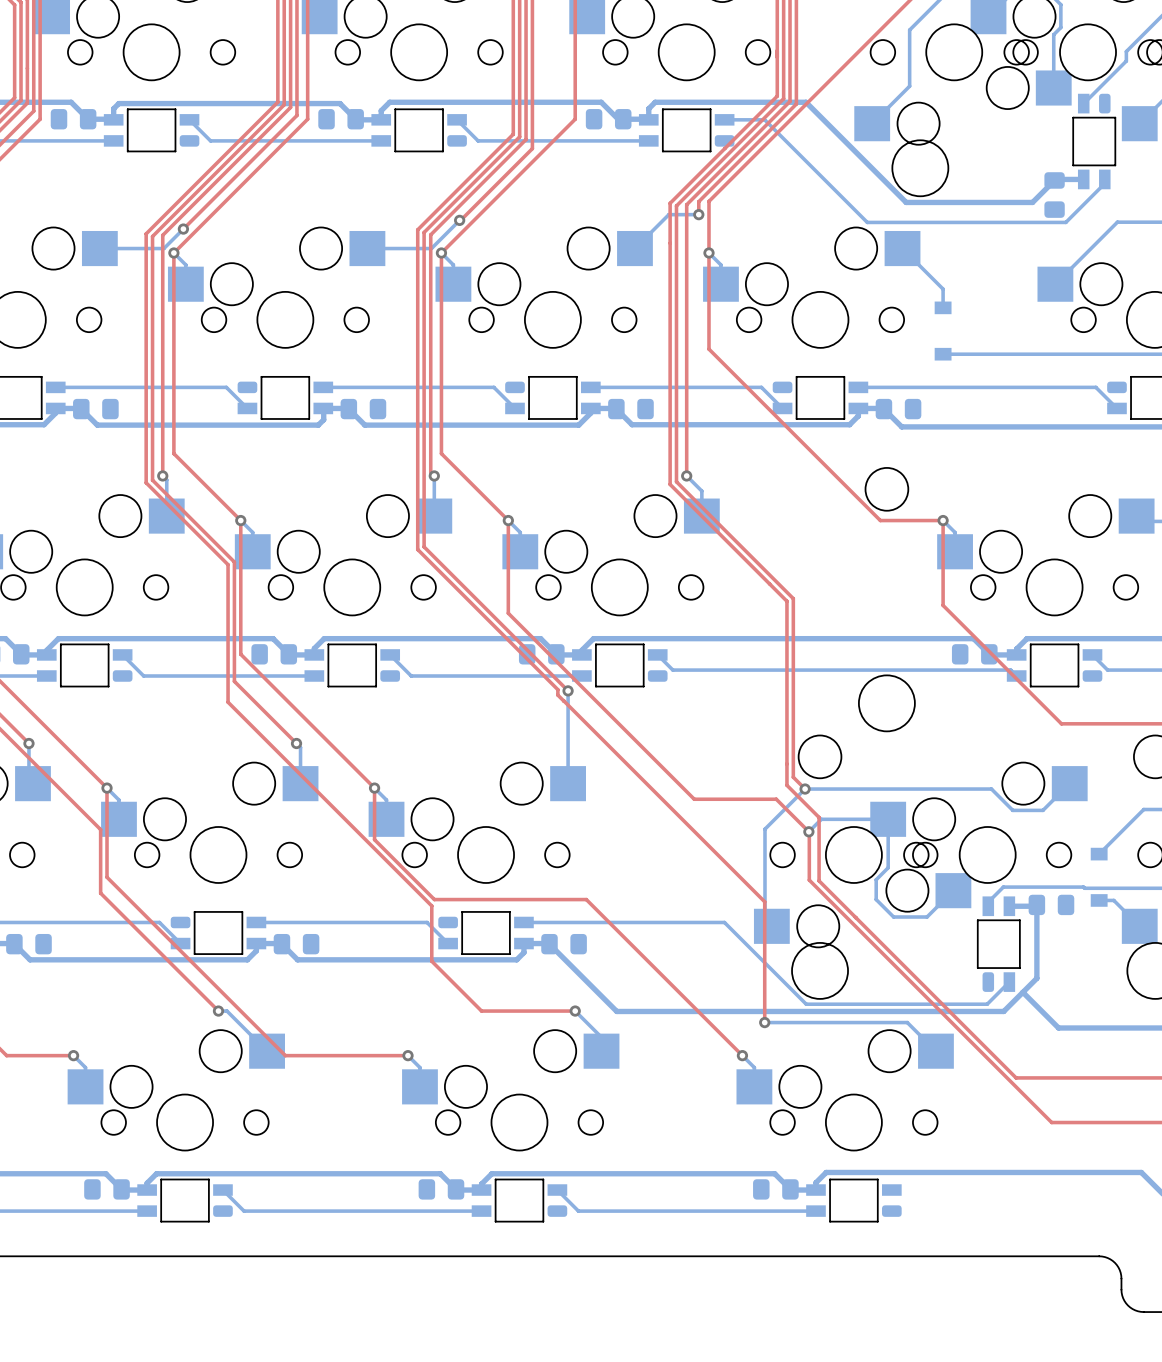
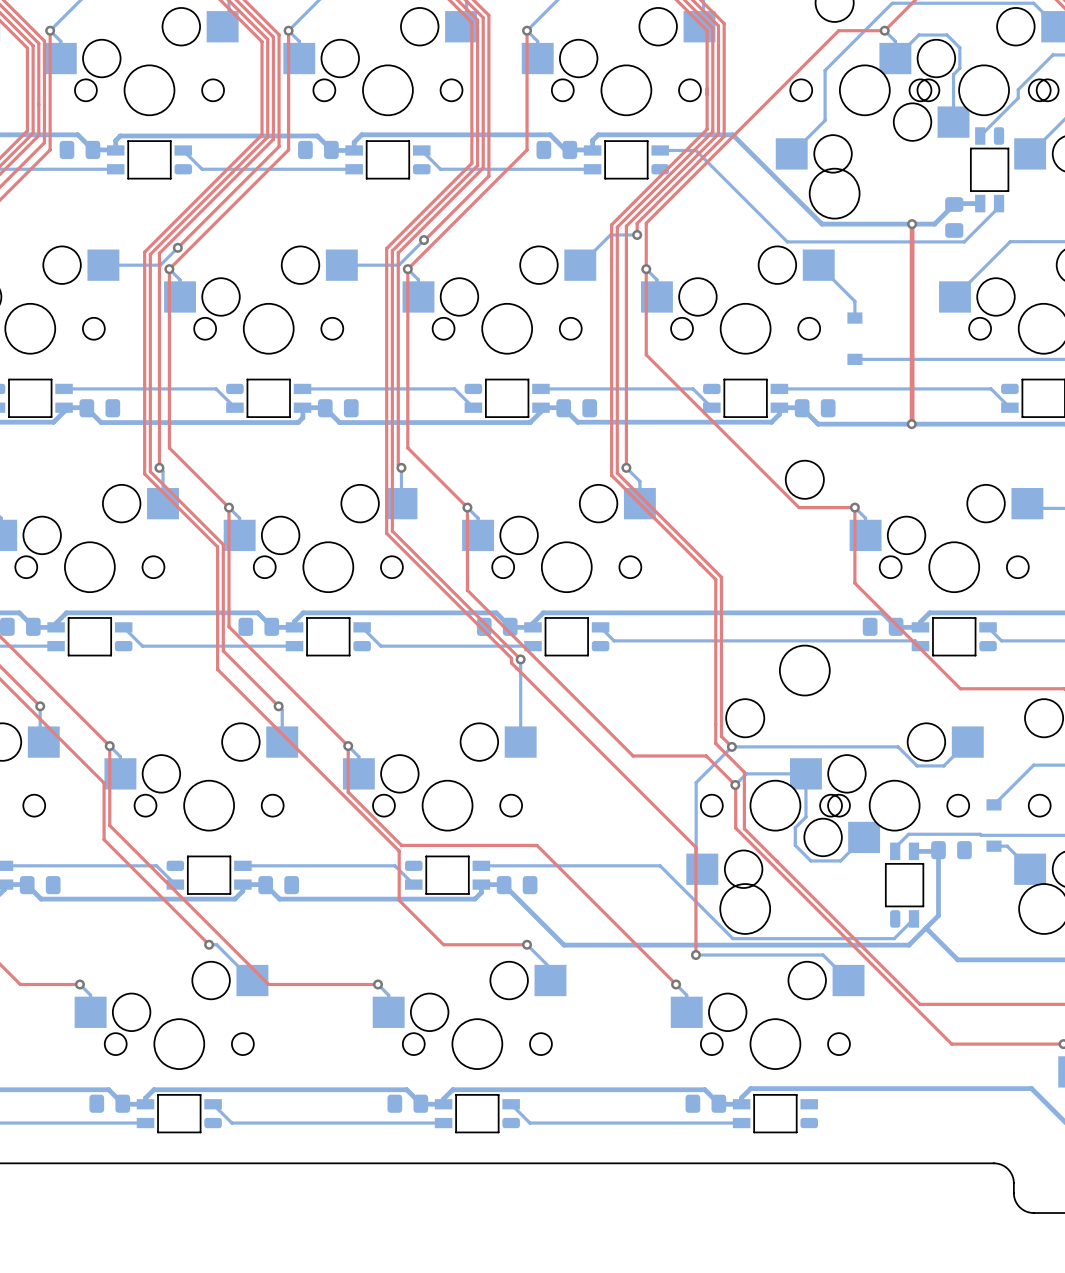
top track: none -> (912, 224) (911, 424)
via: none -> (912, 224)
via: none -> (911, 424)

